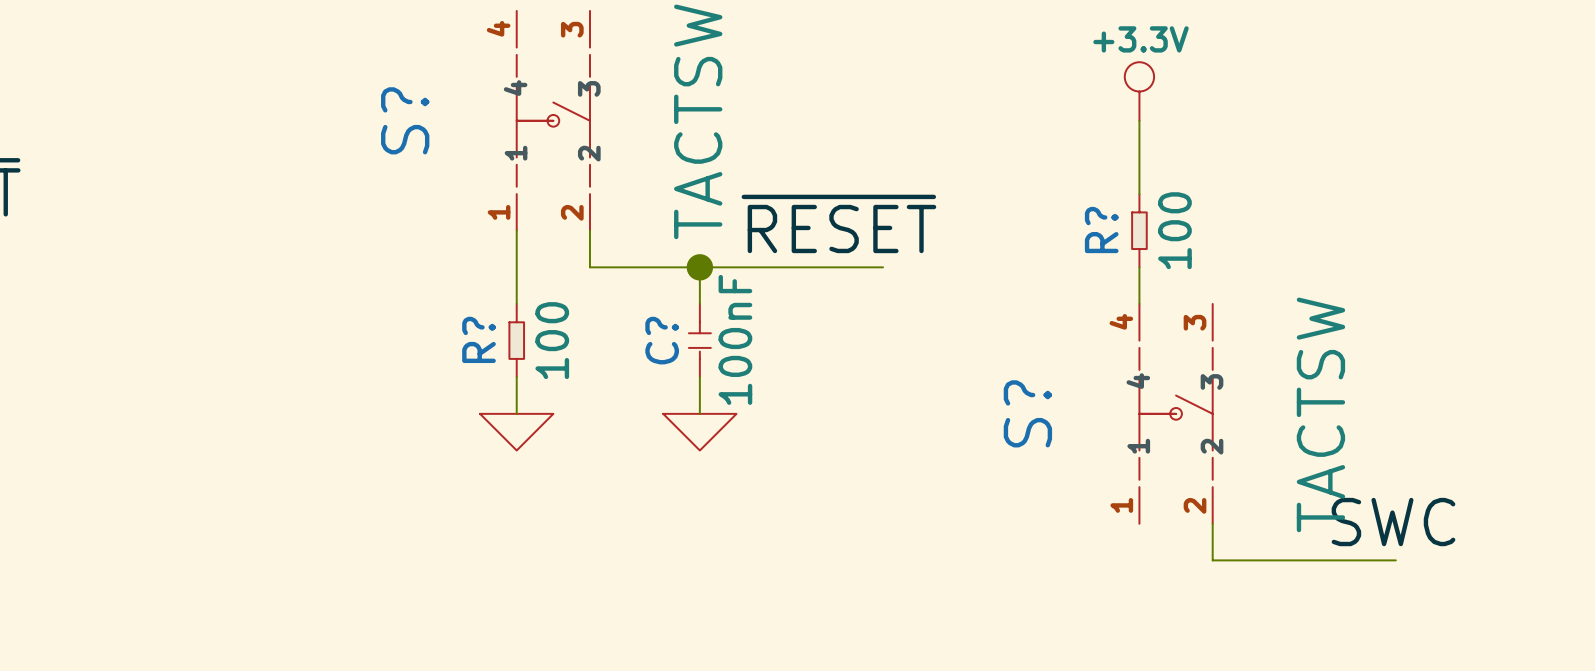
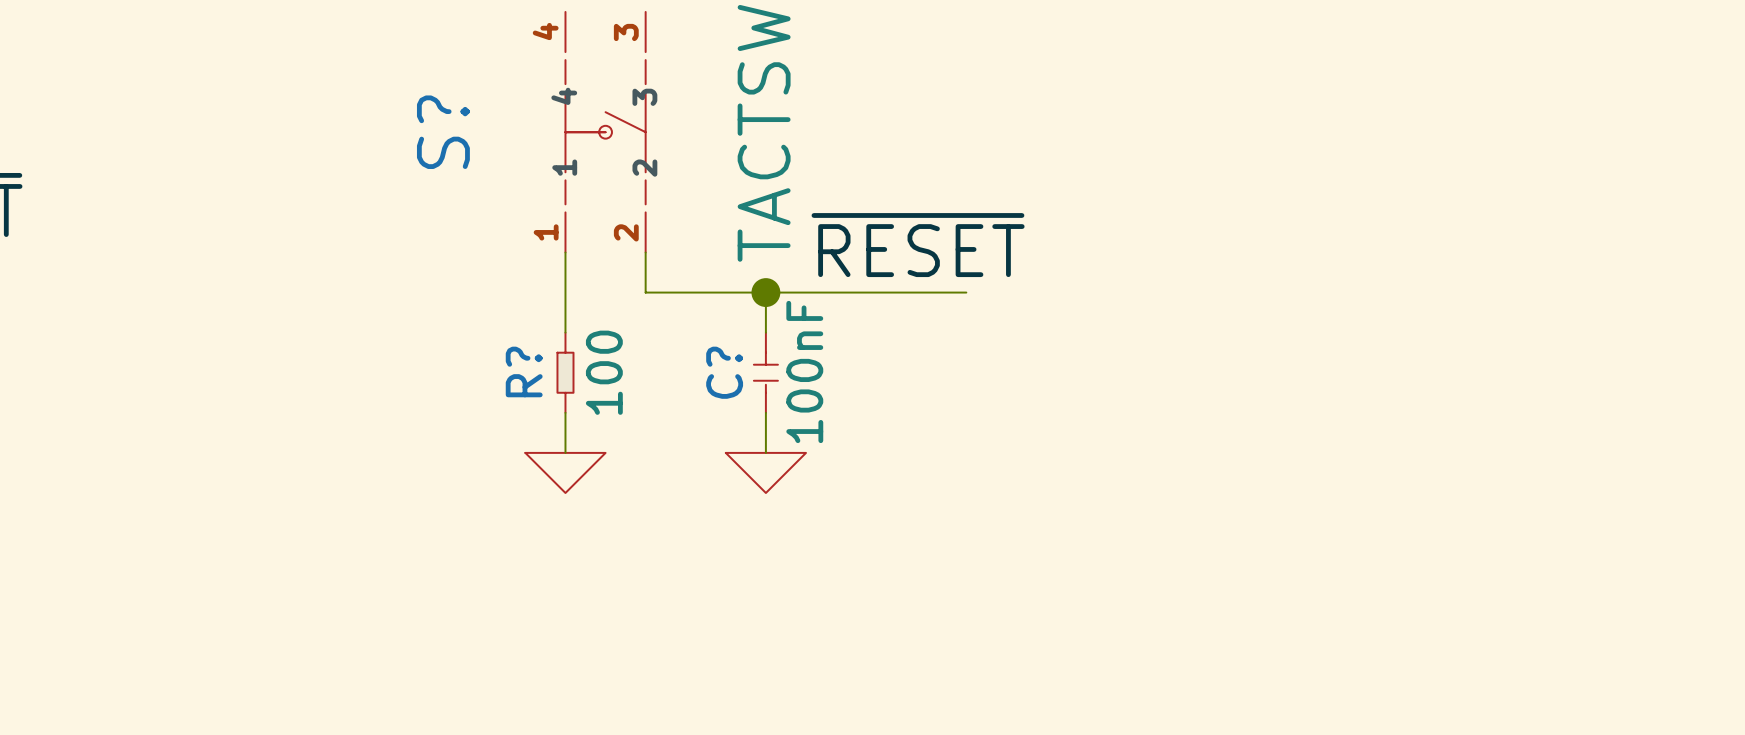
power symbol: +3.3V (1139, 91) -> none
wire: (1139, 120) (1139, 194) -> none
R?: 100 (1139, 230) -> none
wire: (1139, 267) (1139, 303) -> none
S?: TACTSW (1176, 413) -> none
label: SWC (1393, 522) -> none
wire: (1212, 523) (1212, 560) (1395, 560) -> none

